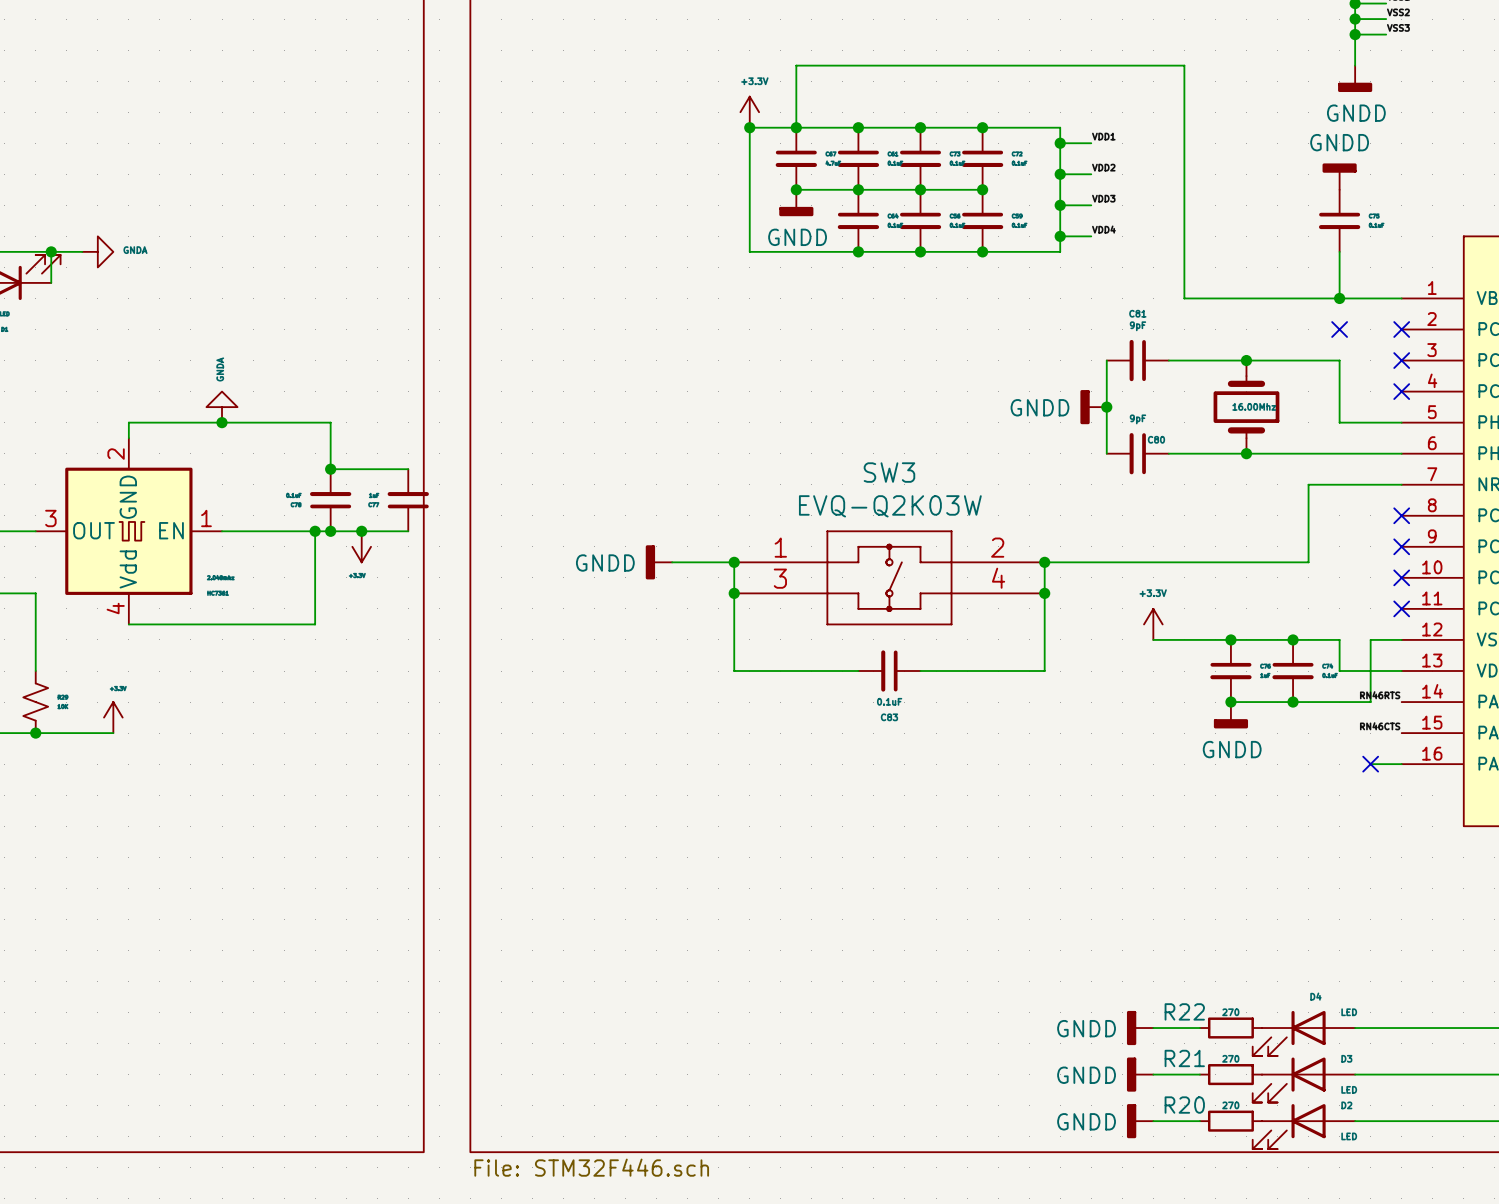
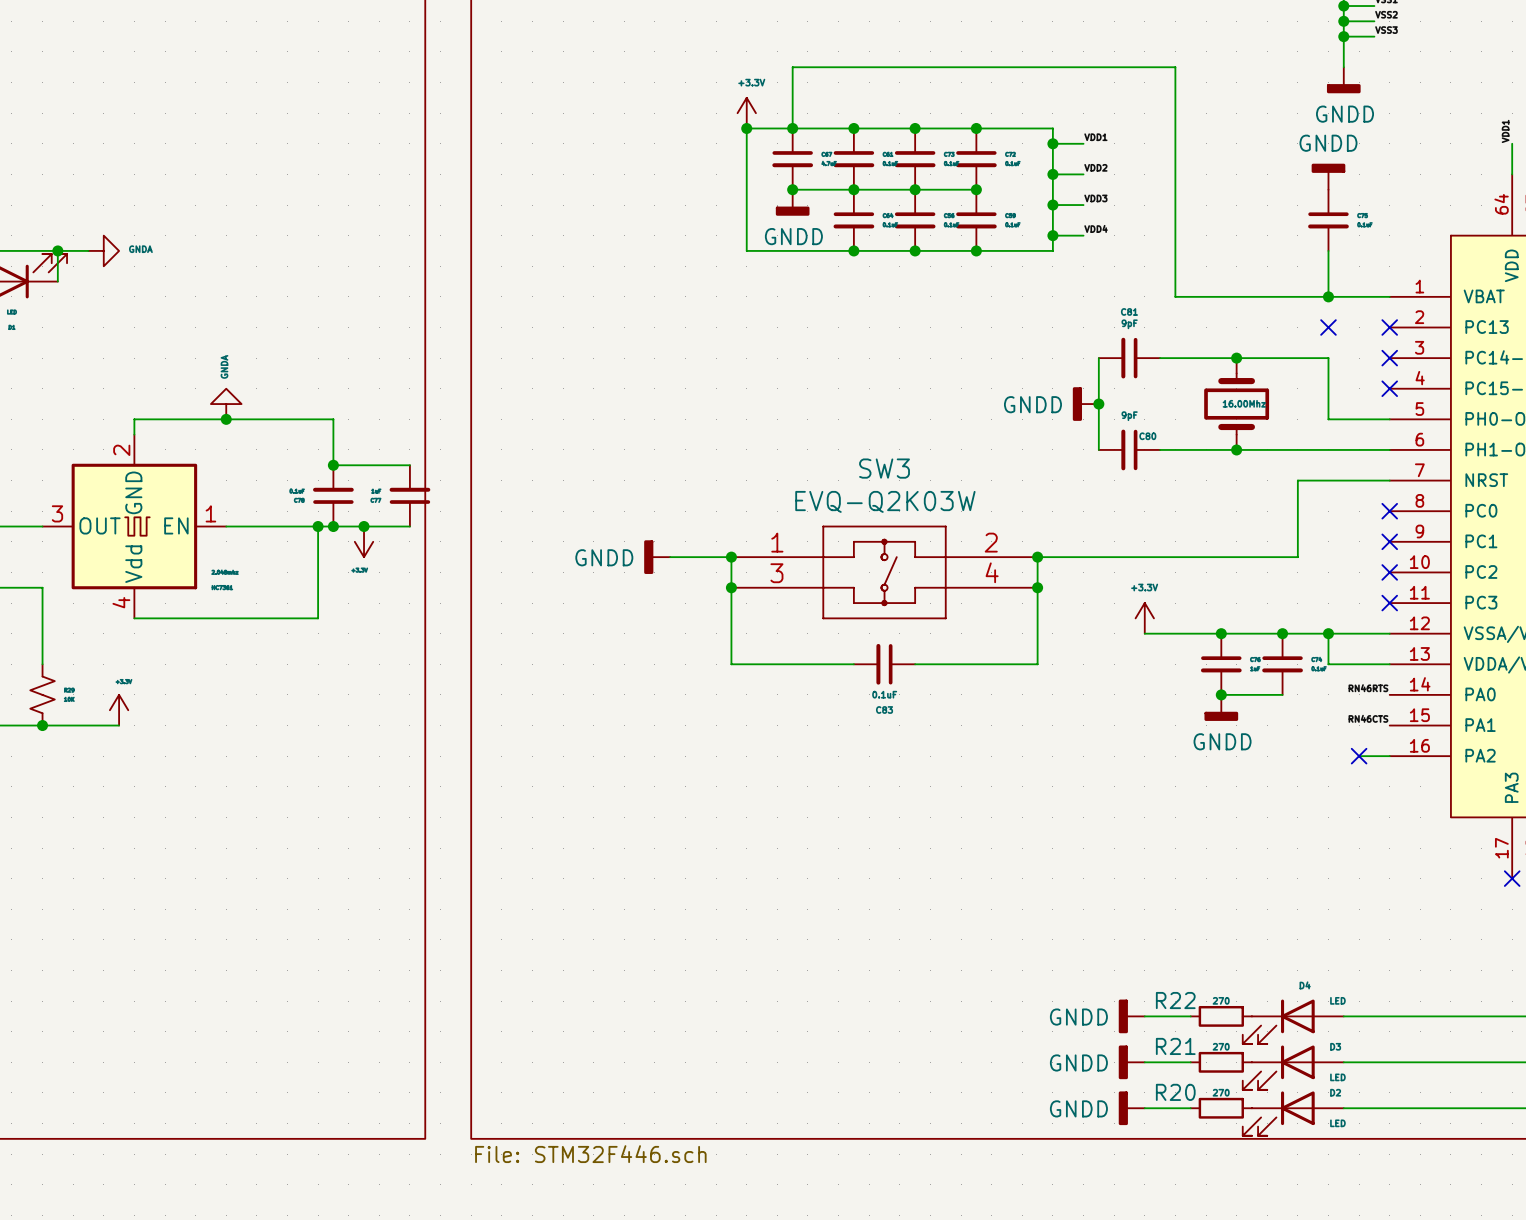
junction: none -> (1328, 633)
wire: (1370, 639) (1370, 702) (1293, 702) -> (1359, 633) (1328, 633)
junction: (1293, 702) -> none

